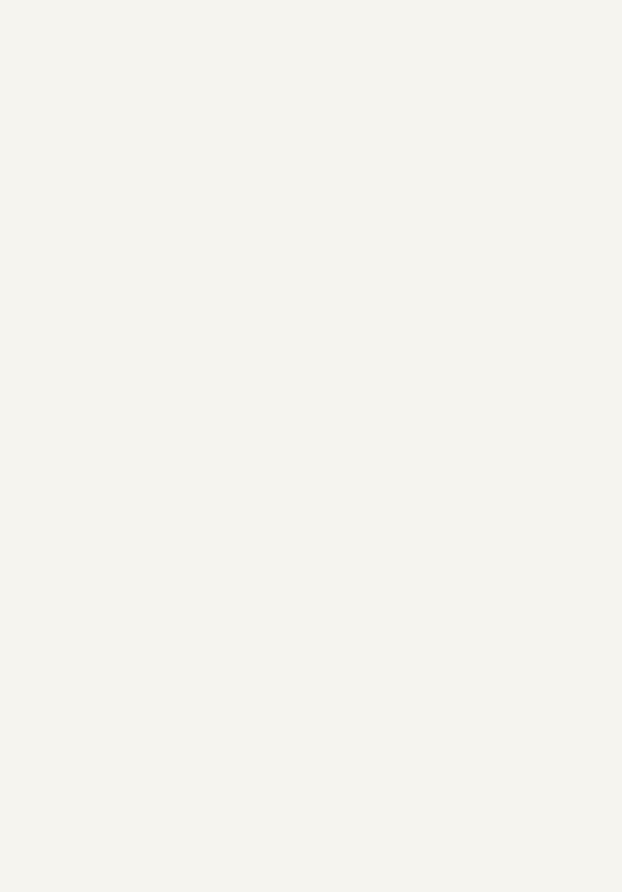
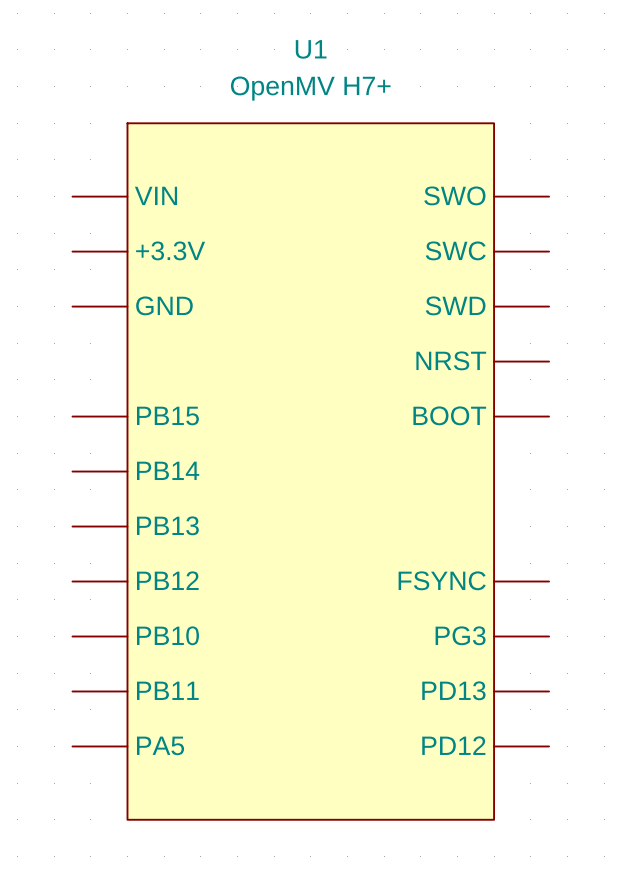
U1: none -> OpenMV H7+ (310, 471)

